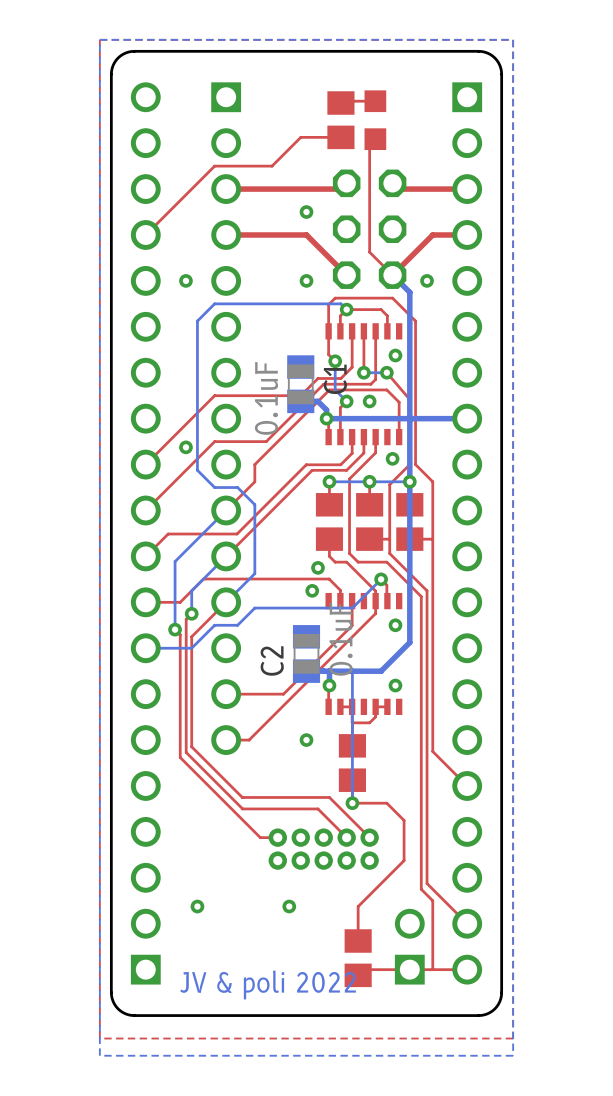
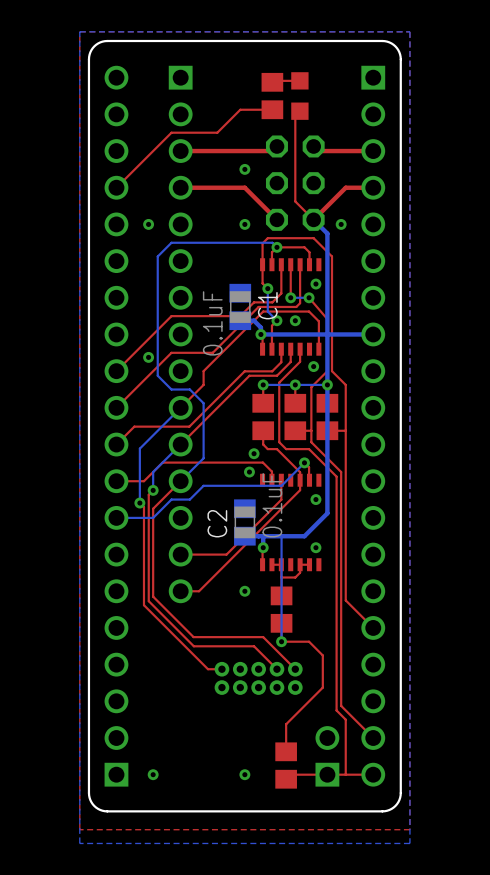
via: (197, 906) -> none
via: (289, 906) -> none
via: none -> (153, 774)
via: none -> (244, 774)
text: JV & poli 2022 (268, 985) -> none

